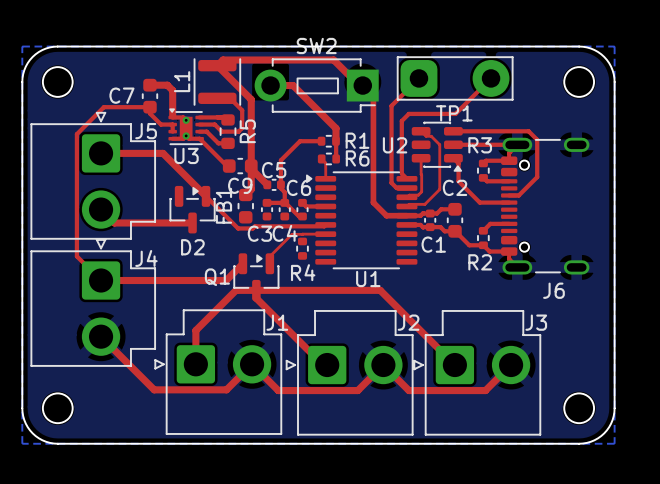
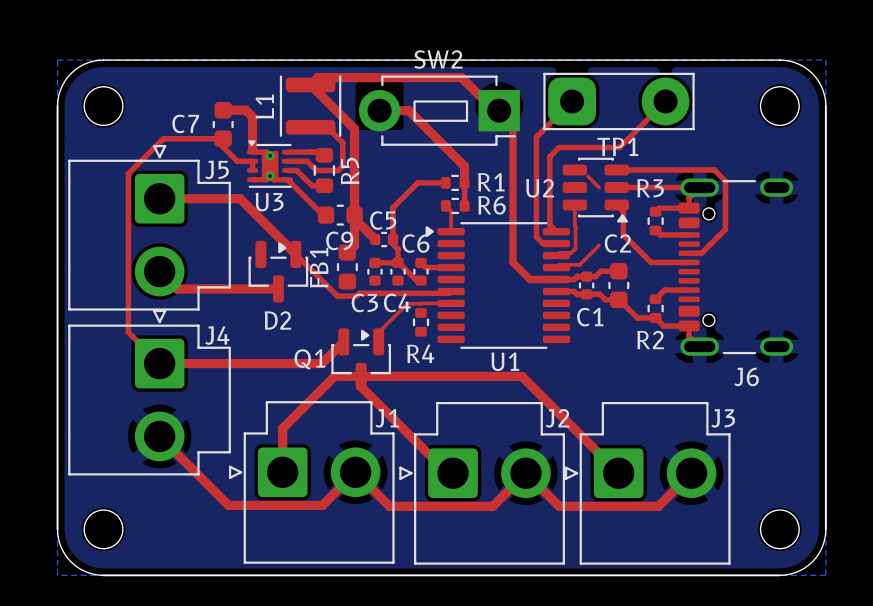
top track: (421, 131) (426, 136) (431, 136) -> none
top track: (439, 144) (439, 189) -> none

